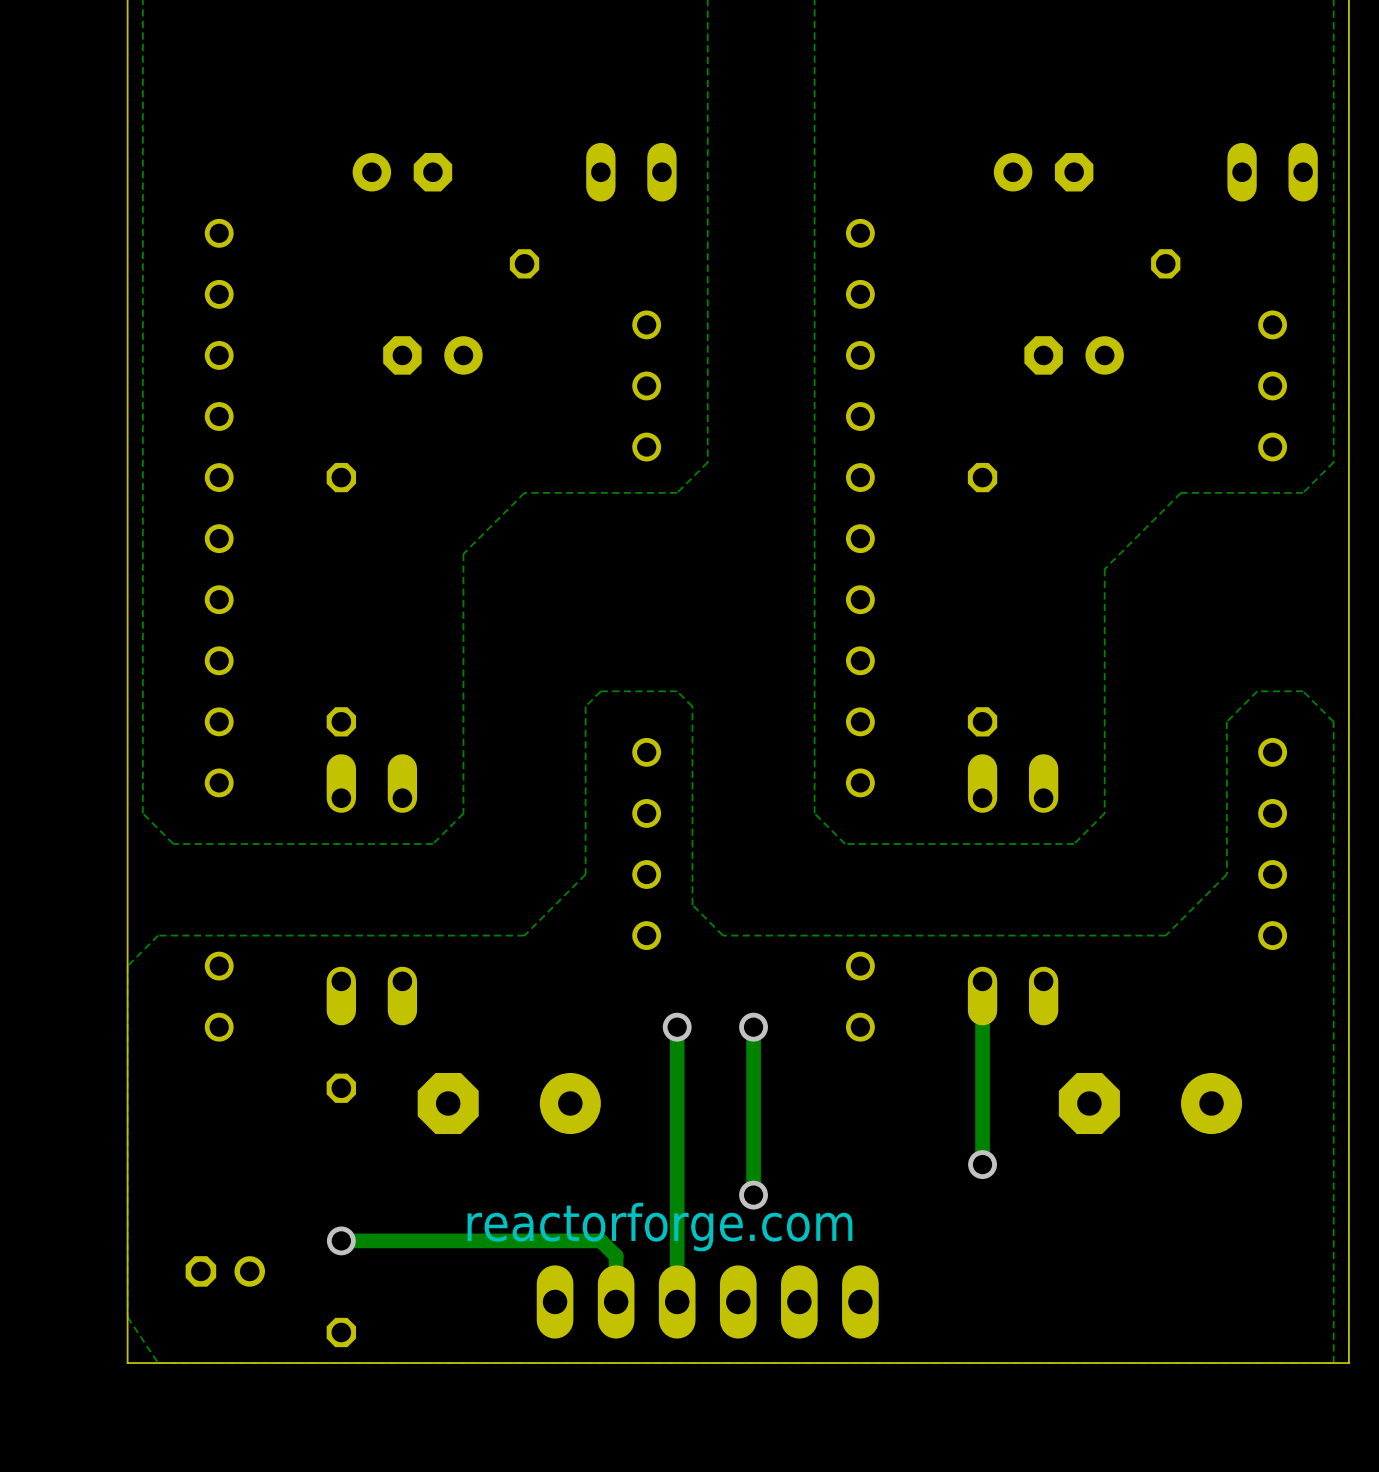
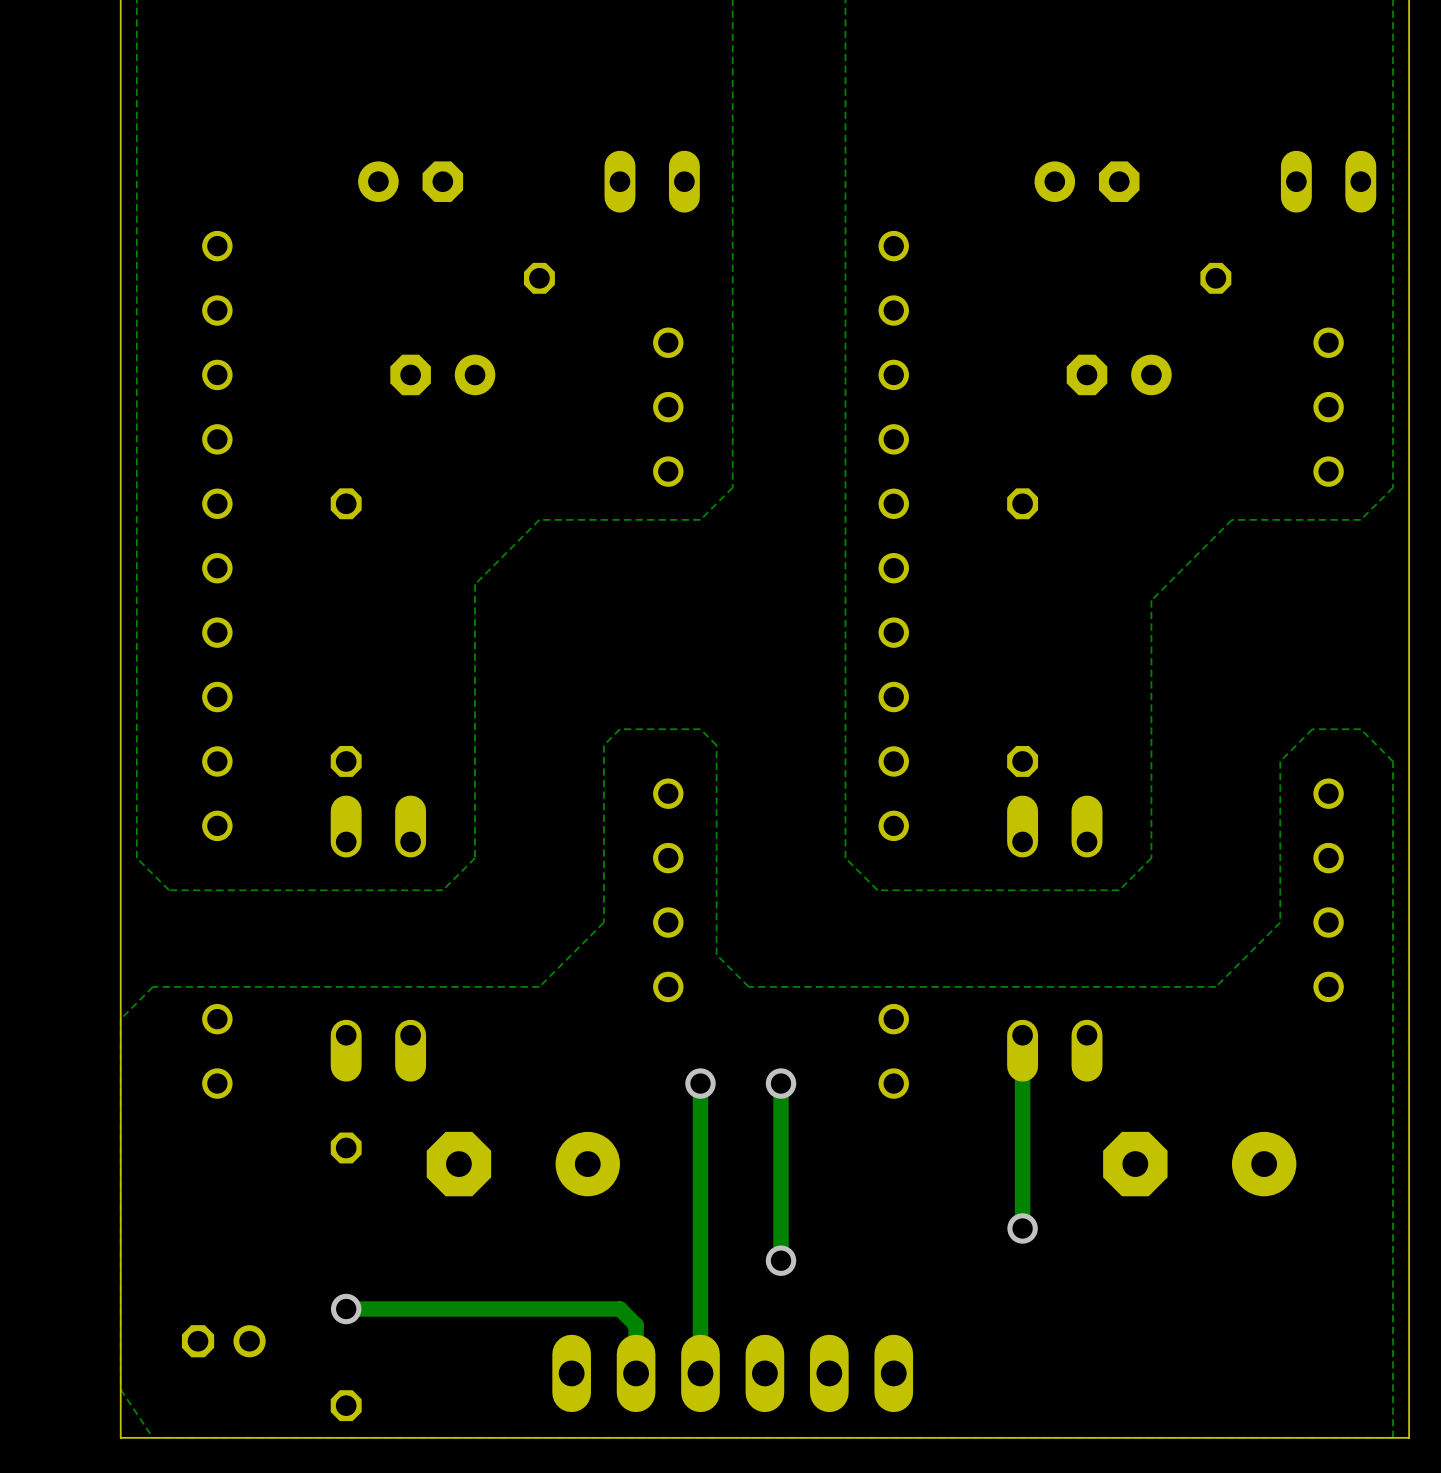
text: reactorforge.com (659, 1227) -> none

